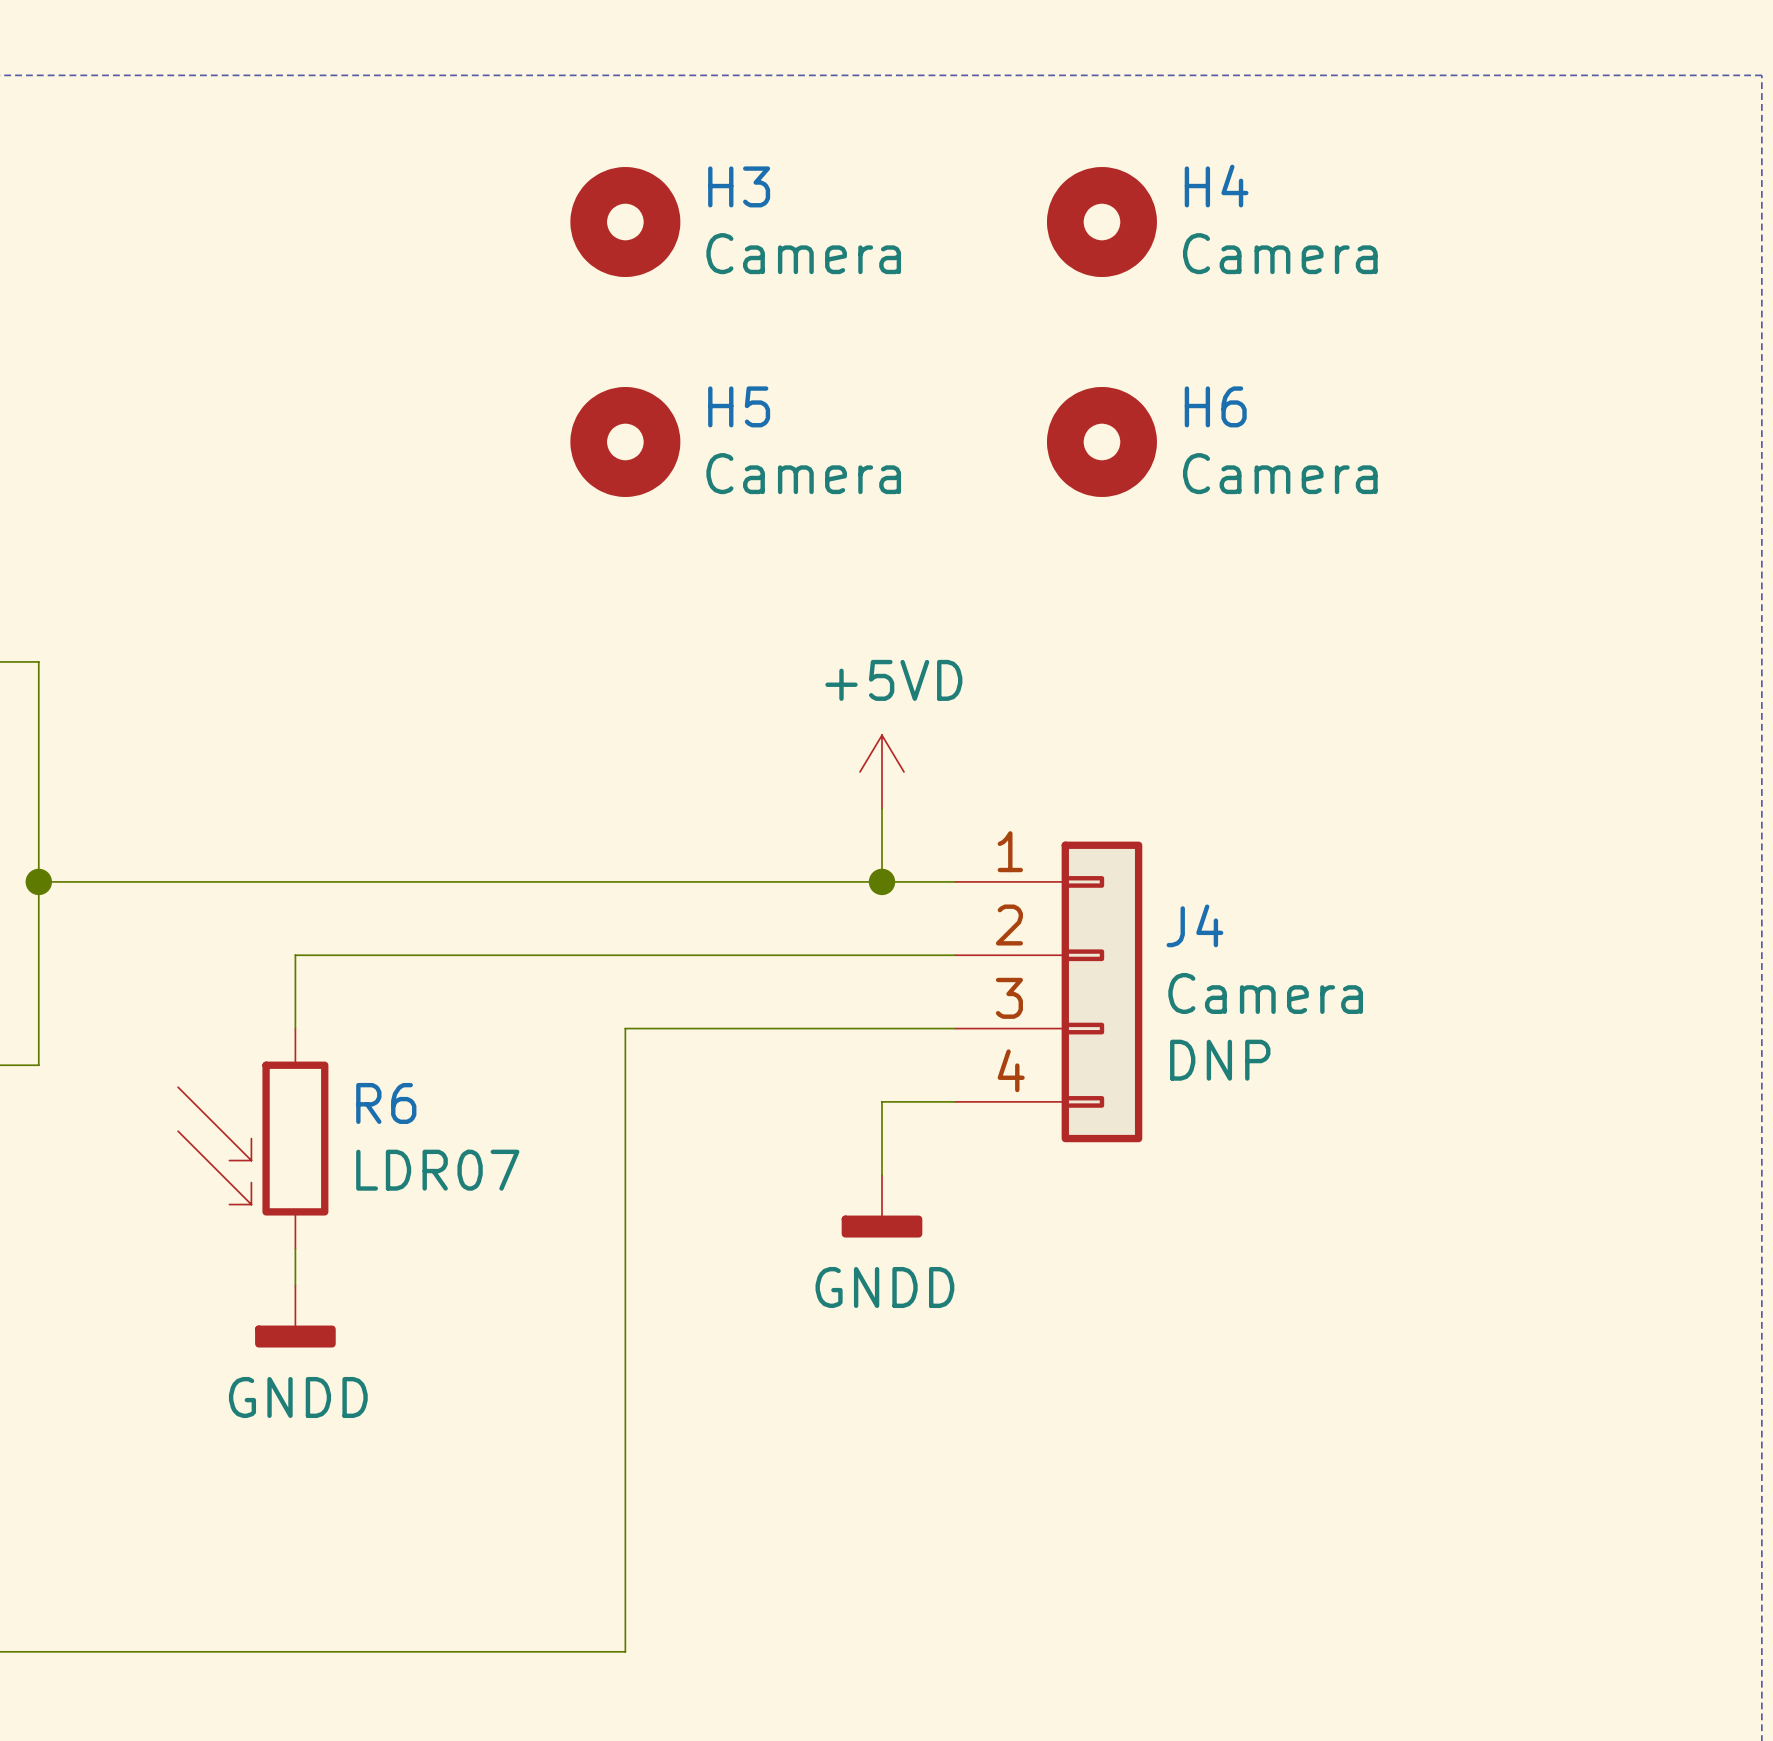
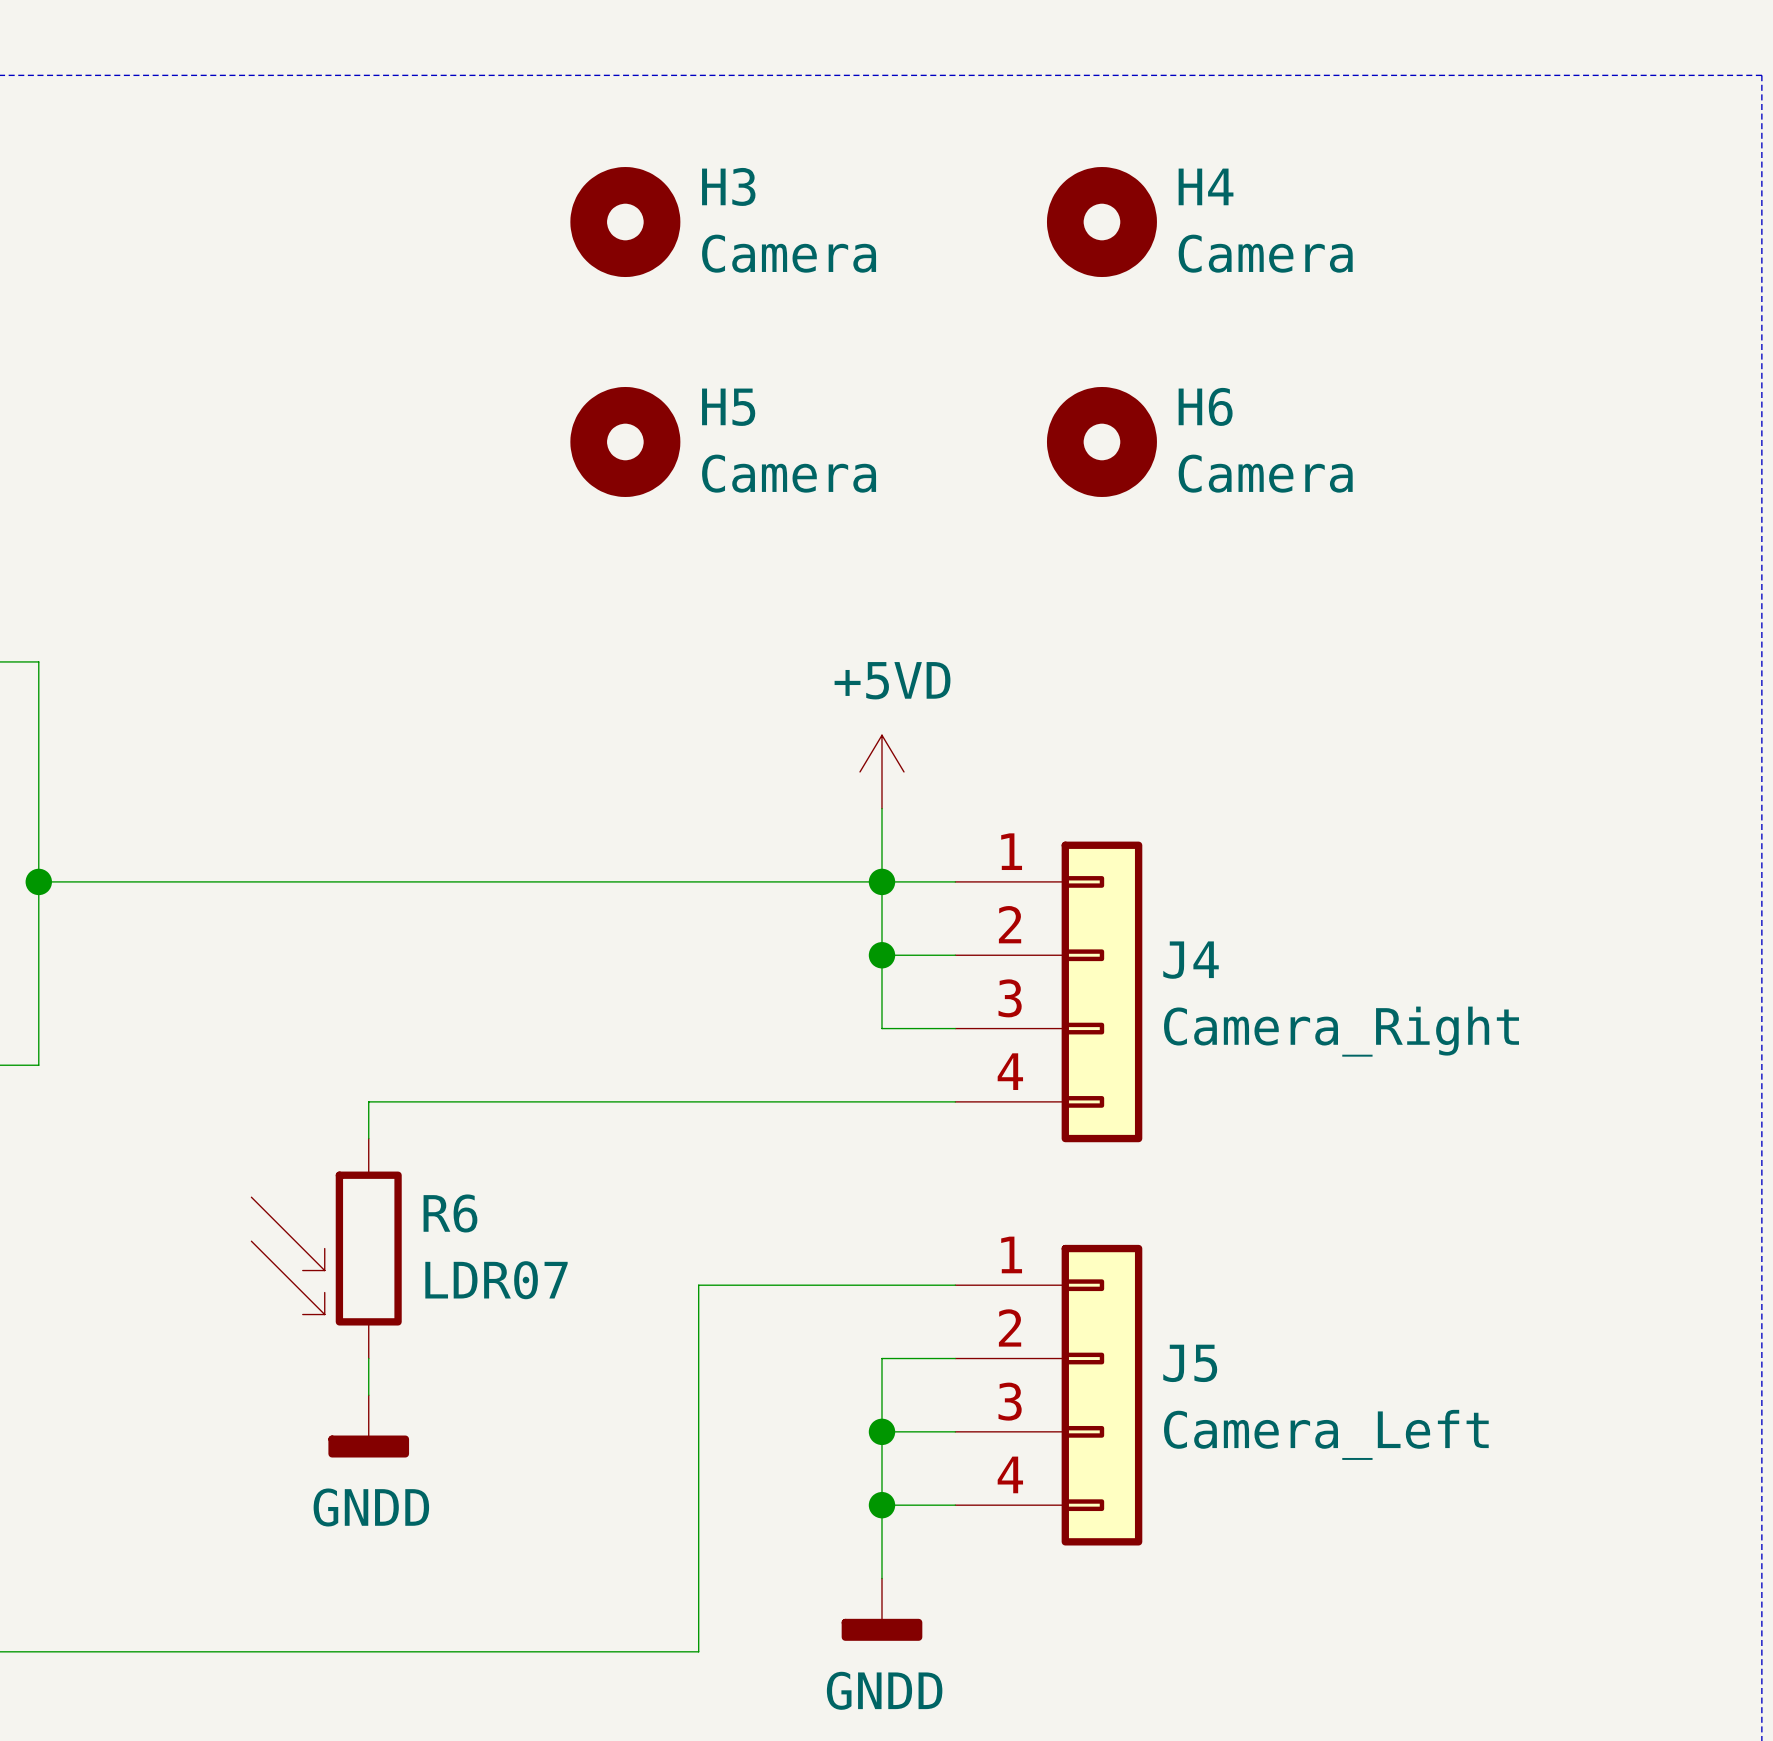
wire: none -> (881, 881) (881, 1028)
J4 name position: J4 (1194, 925) -> J4 (1191, 960)
wire: (881, 955) (295, 955) (295, 1028) -> none
junction: none -> (881, 955)
J4 value: Camera (1265, 993) -> Camera_Right (1341, 1031)
wire: (881, 1028) (625, 1028) (625, 1651) -> (955, 1285) (698, 1285) (698, 1651) (625, 1651)
J4 text: DNP (1220, 1060) -> none
wire: (881, 1101) (881, 1175) -> (881, 1101) (368, 1101) (368, 1138)
R6 position: (253, 1138) -> (326, 1248)
power symbol: GNDD (881, 1206) -> none
wire: (295, 1248) (295, 1285) -> (368, 1358) (368, 1395)
power symbol position: GNDD (295, 1316) -> GNDD (368, 1426)
wire: none -> (955, 1358) (881, 1358) (881, 1578)
J5: none -> Camera_Left (1048, 1395)
wire: none -> (881, 1431) (955, 1431)
junction: none -> (881, 1431)
wire: none -> (881, 1505) (955, 1505)
junction: none -> (881, 1505)
power symbol: none -> GNDD (881, 1609)

